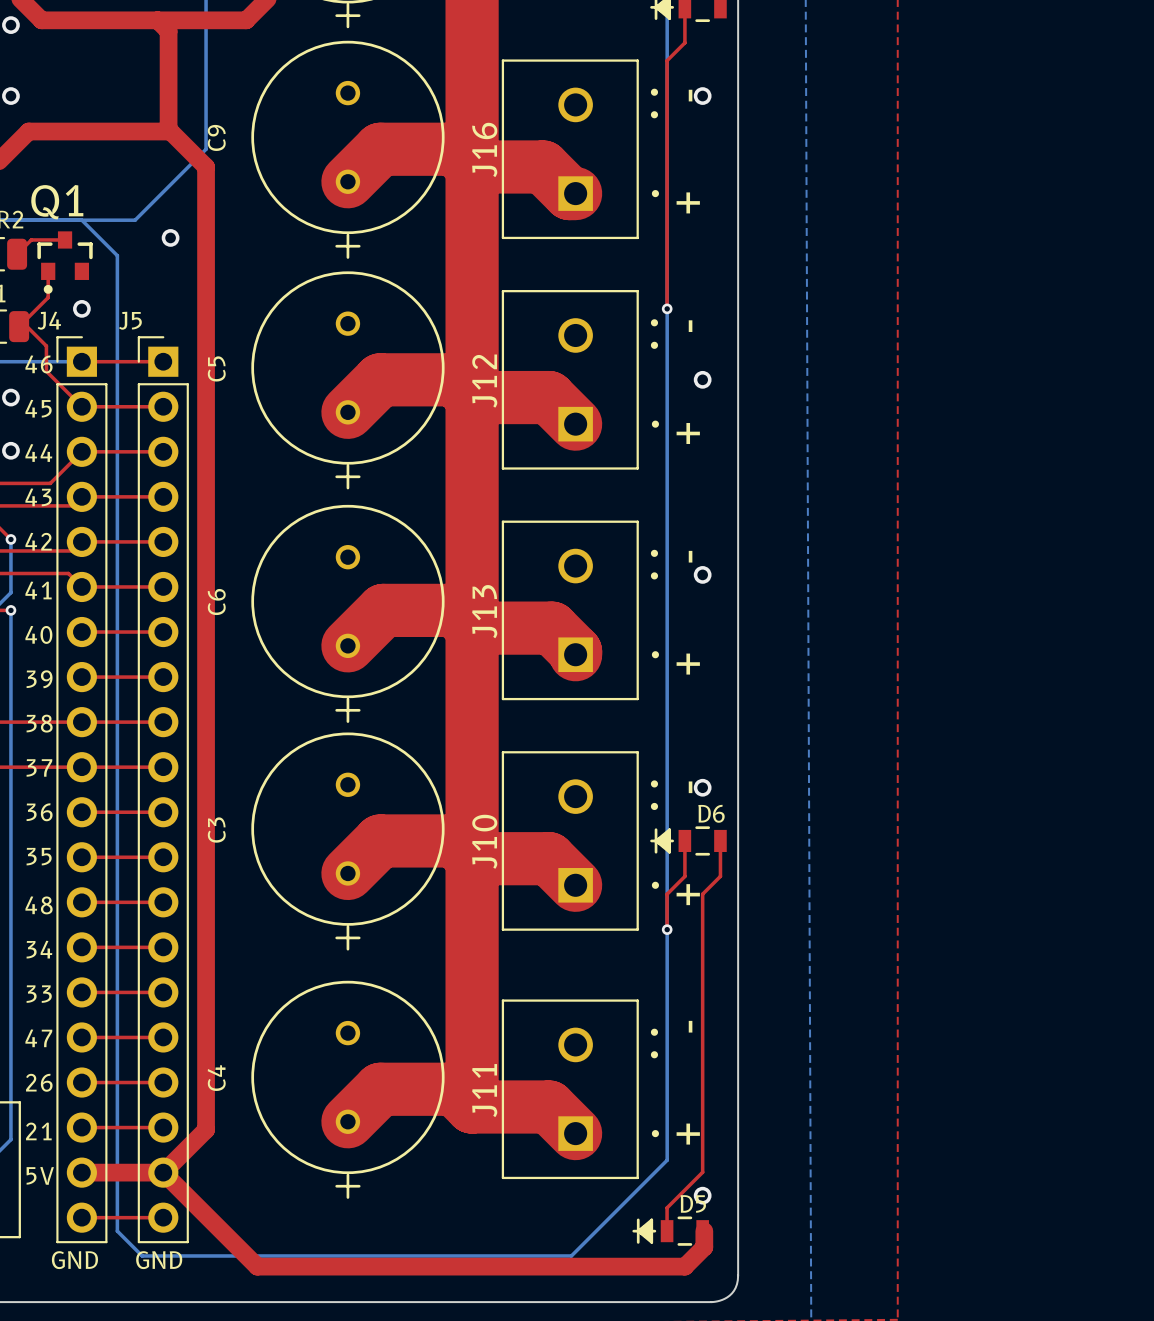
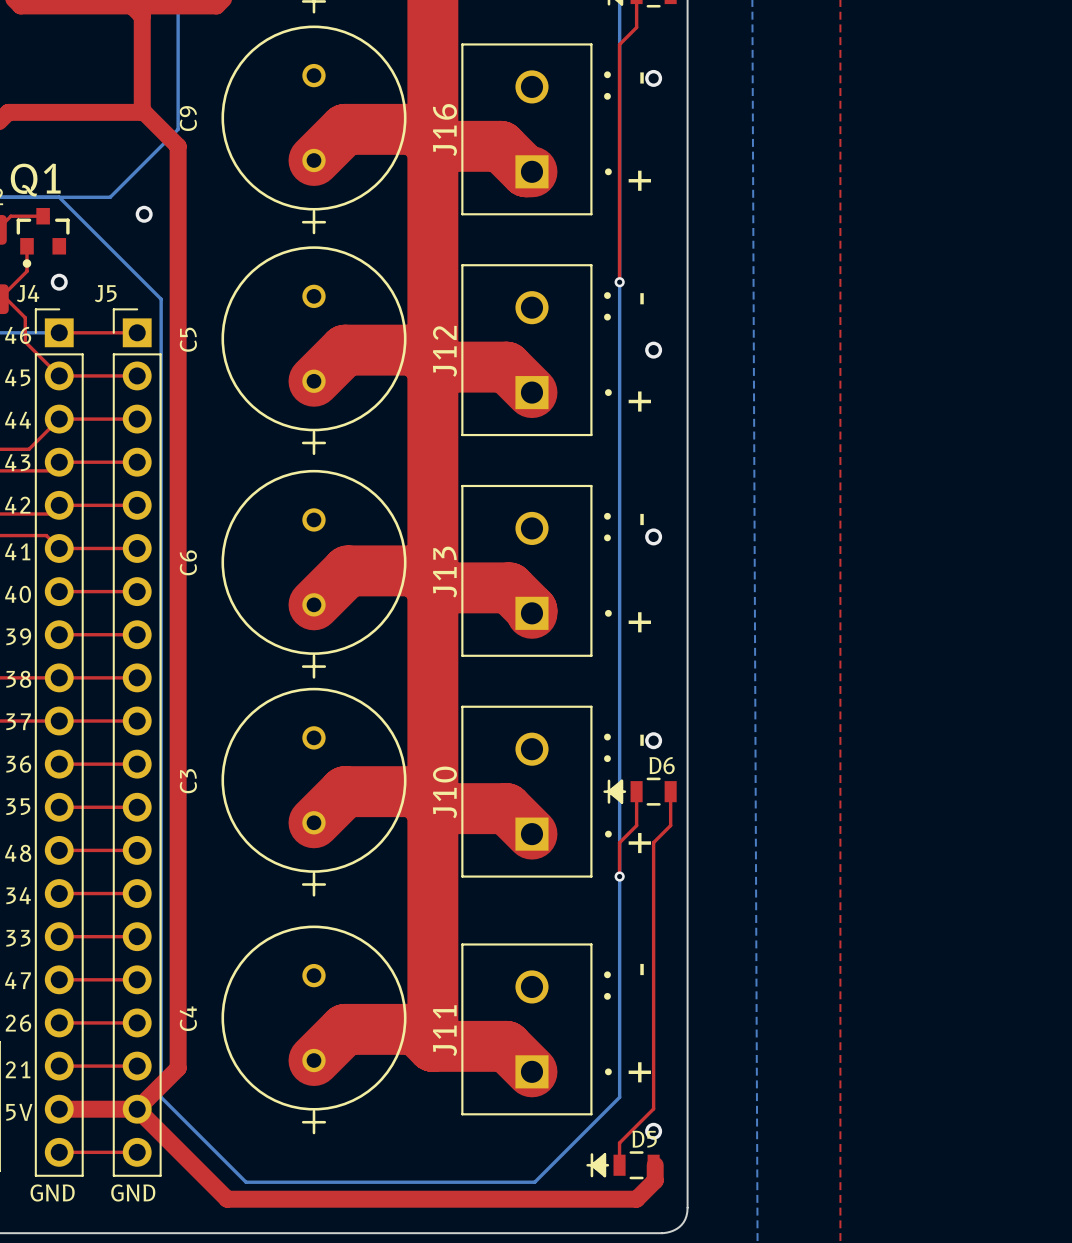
bottom track: (117, 255) (117, 1231) (142, 1255) (571, 1255) (578, 1248) -> (93, 231) (161, 299) (161, 1097) (246, 1182) (534, 1182)

